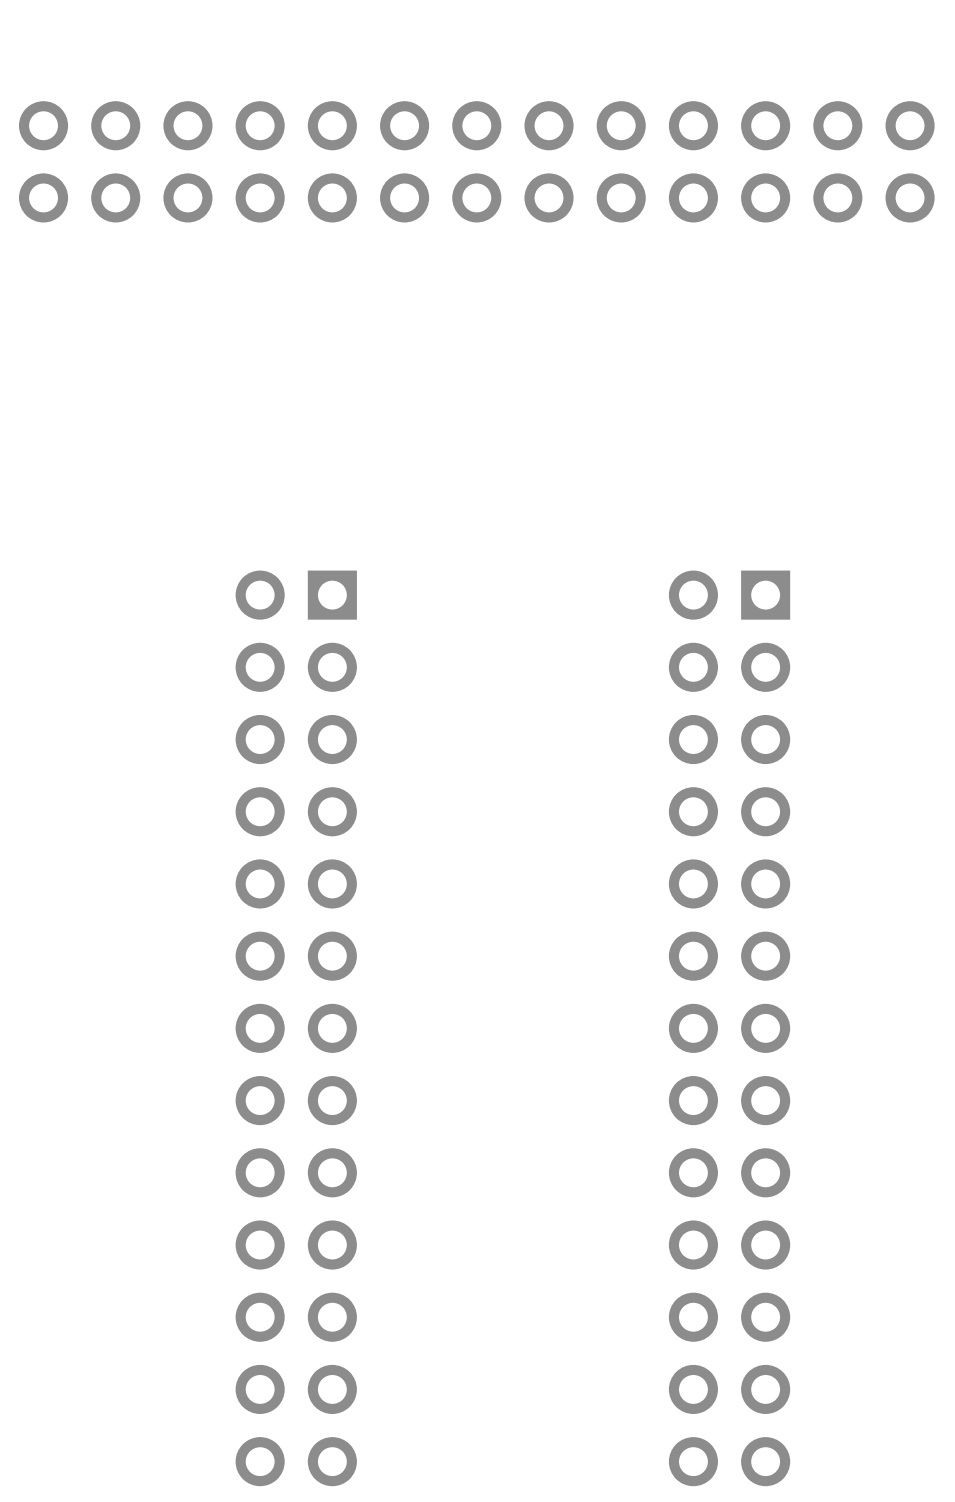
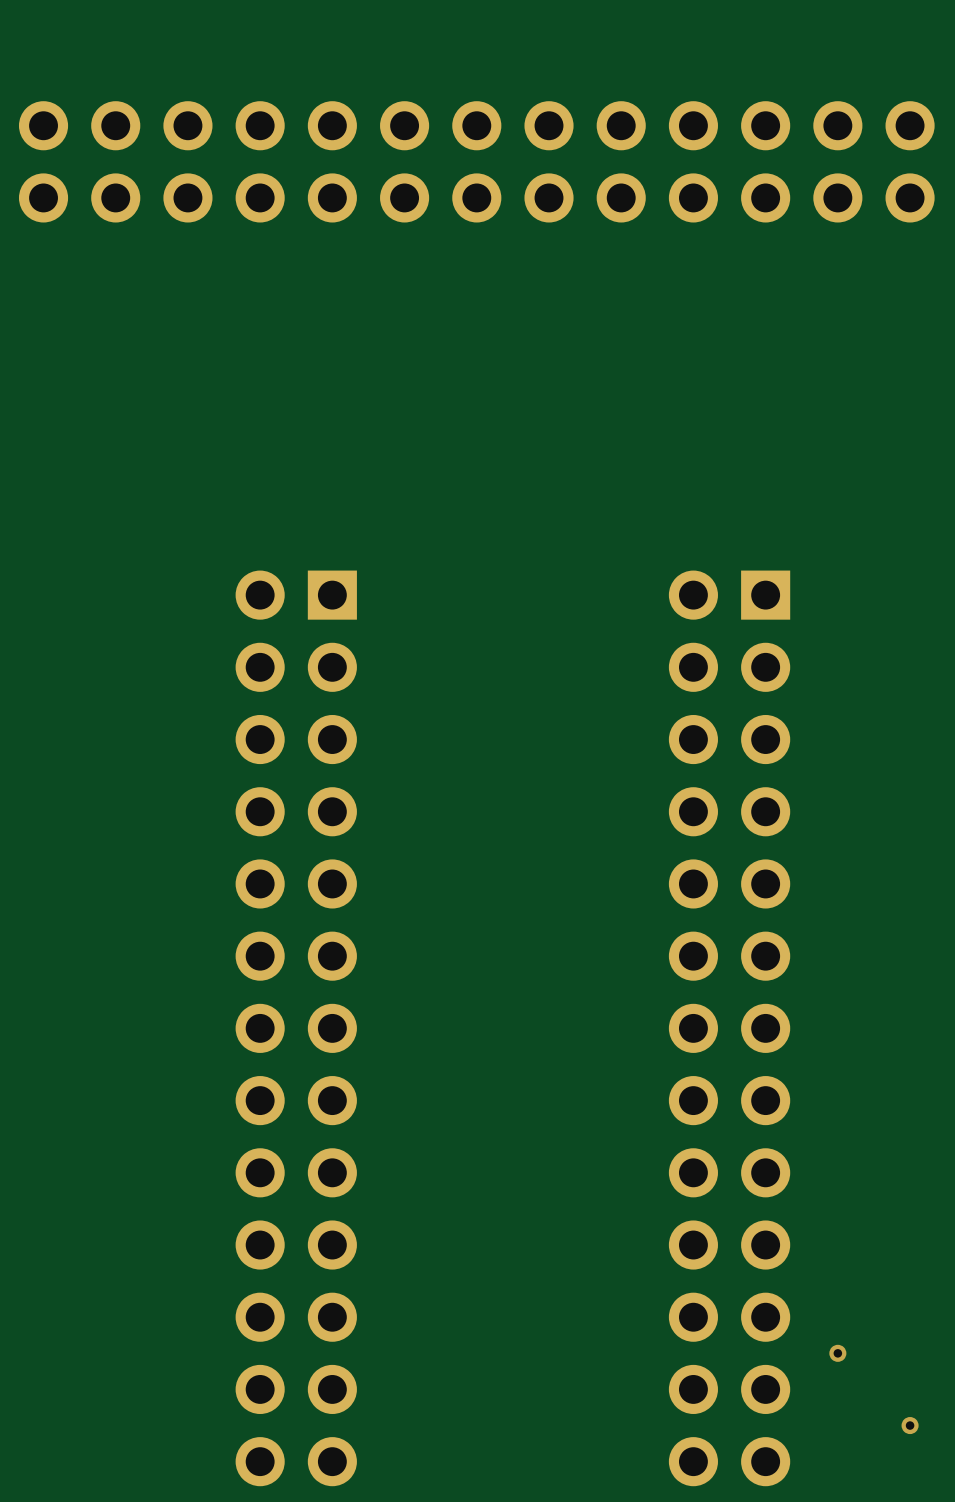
via: none -> (837, 1353)
via: none -> (910, 1425)

